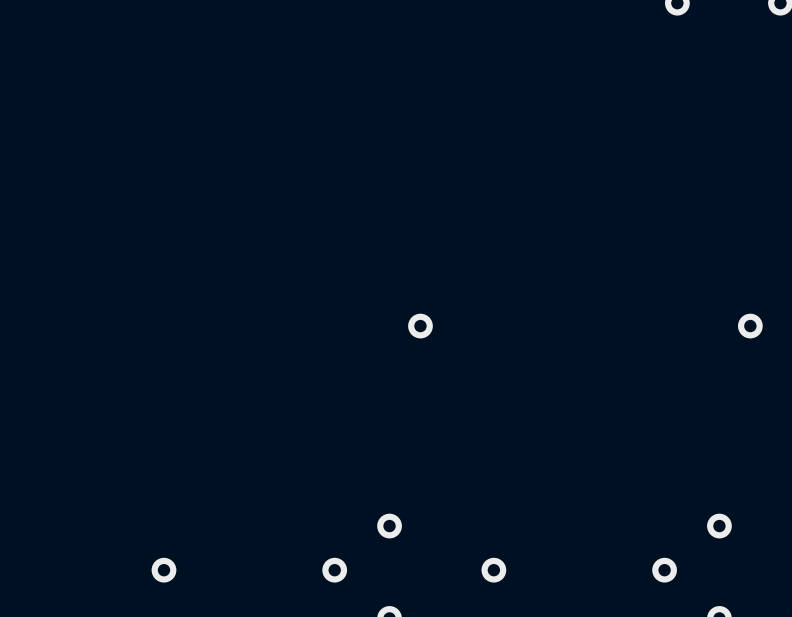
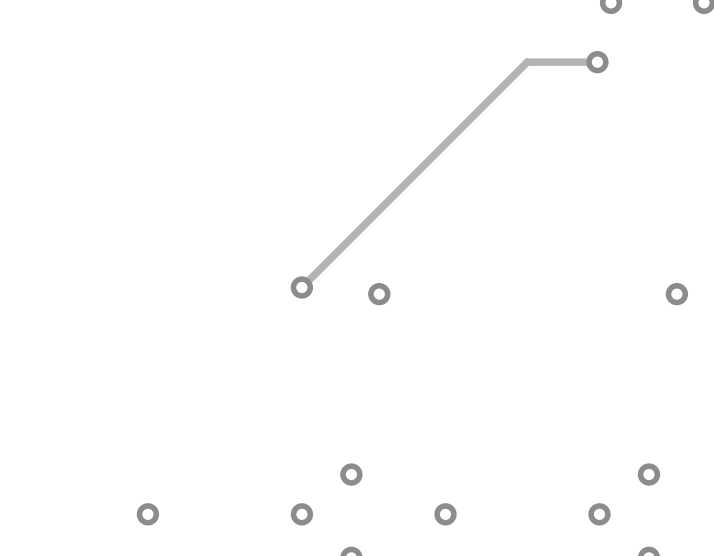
track: none -> (597, 62) (527, 62) (301, 287)
via: none -> (597, 62)
via: none -> (301, 287)

